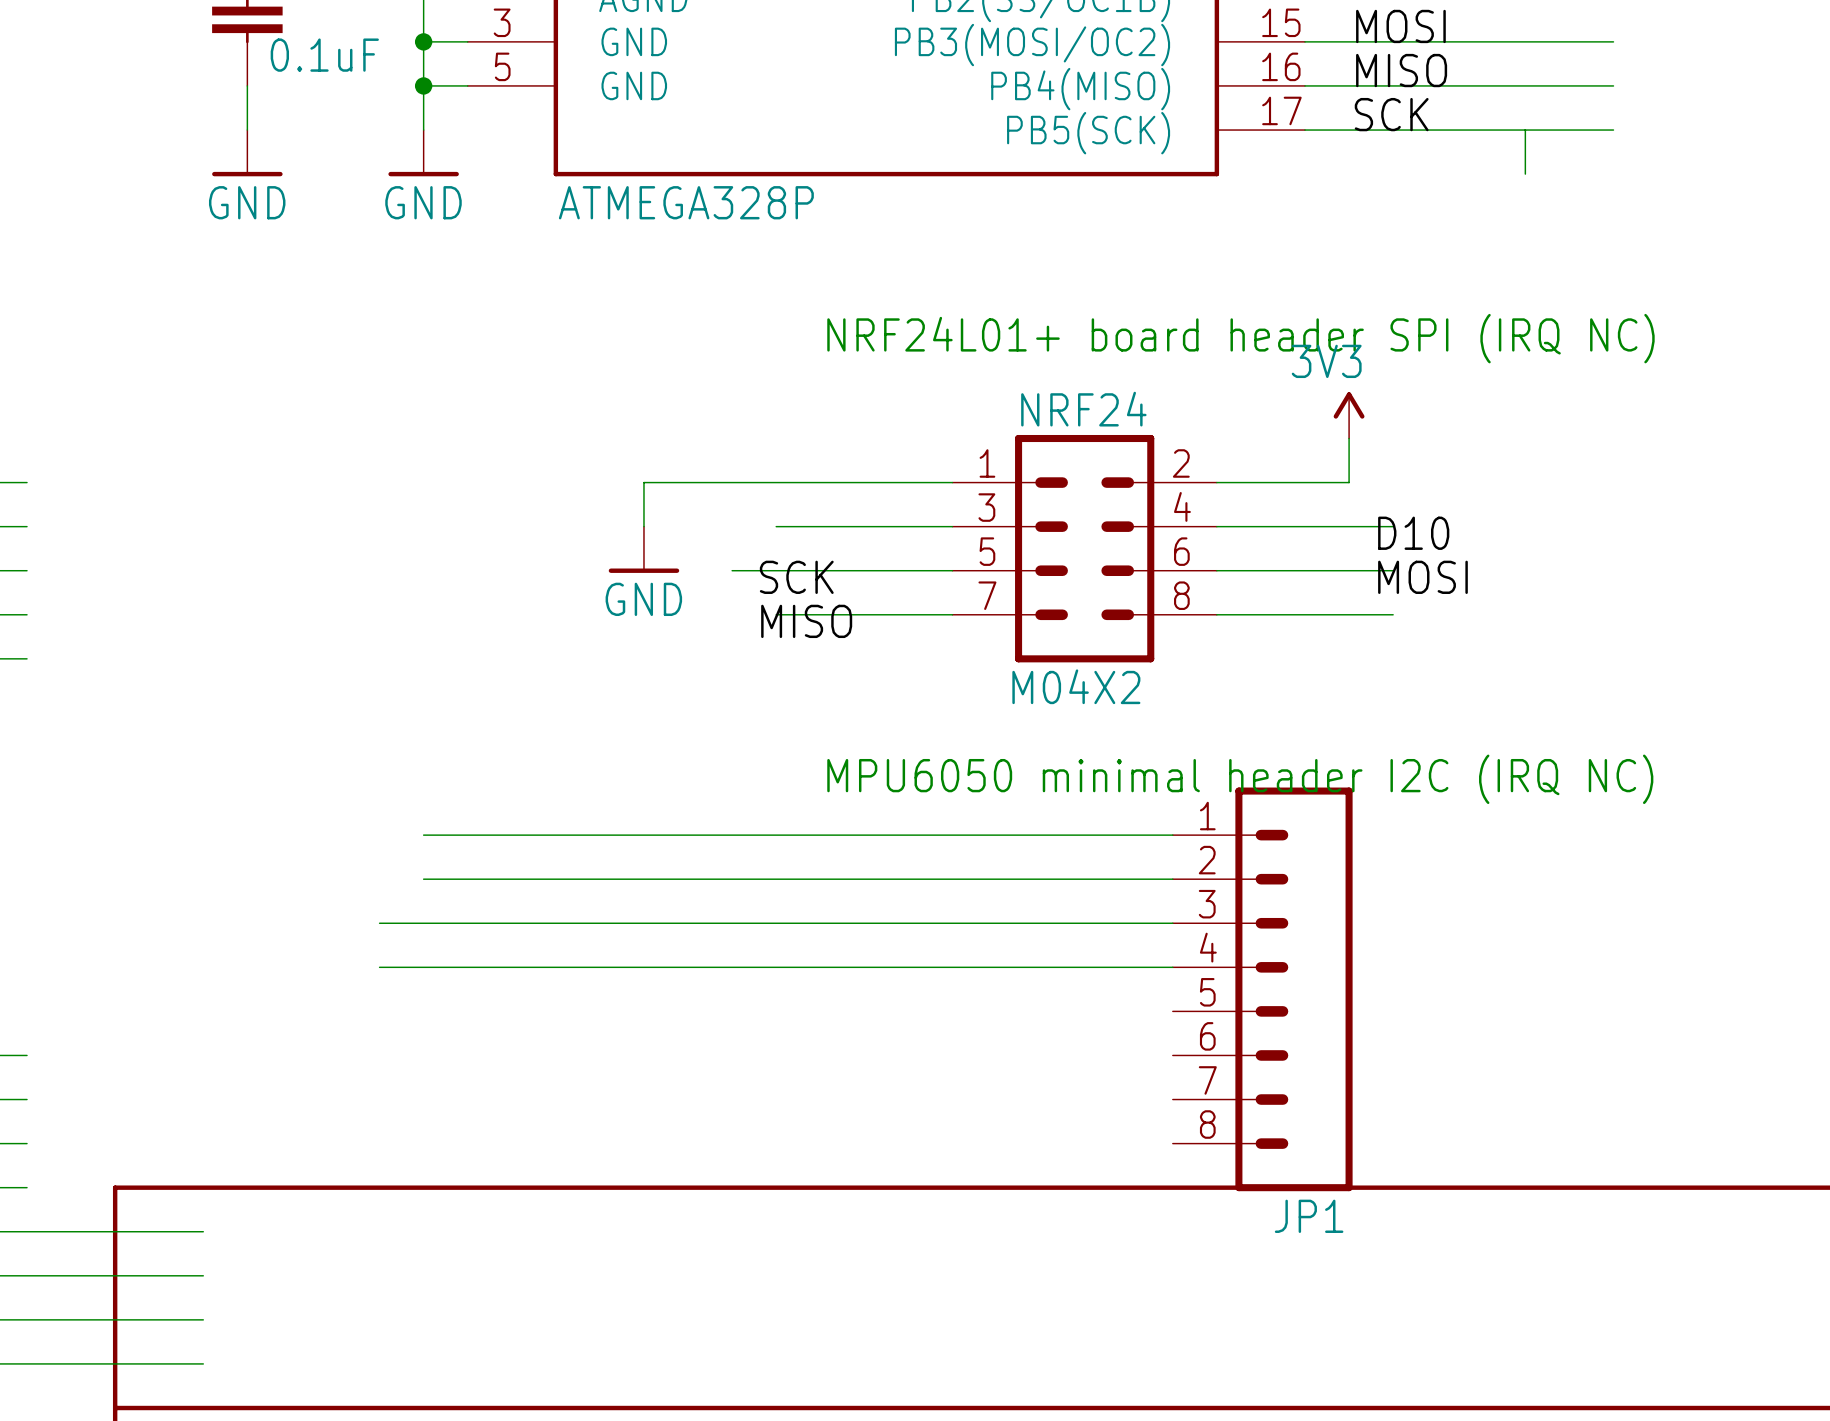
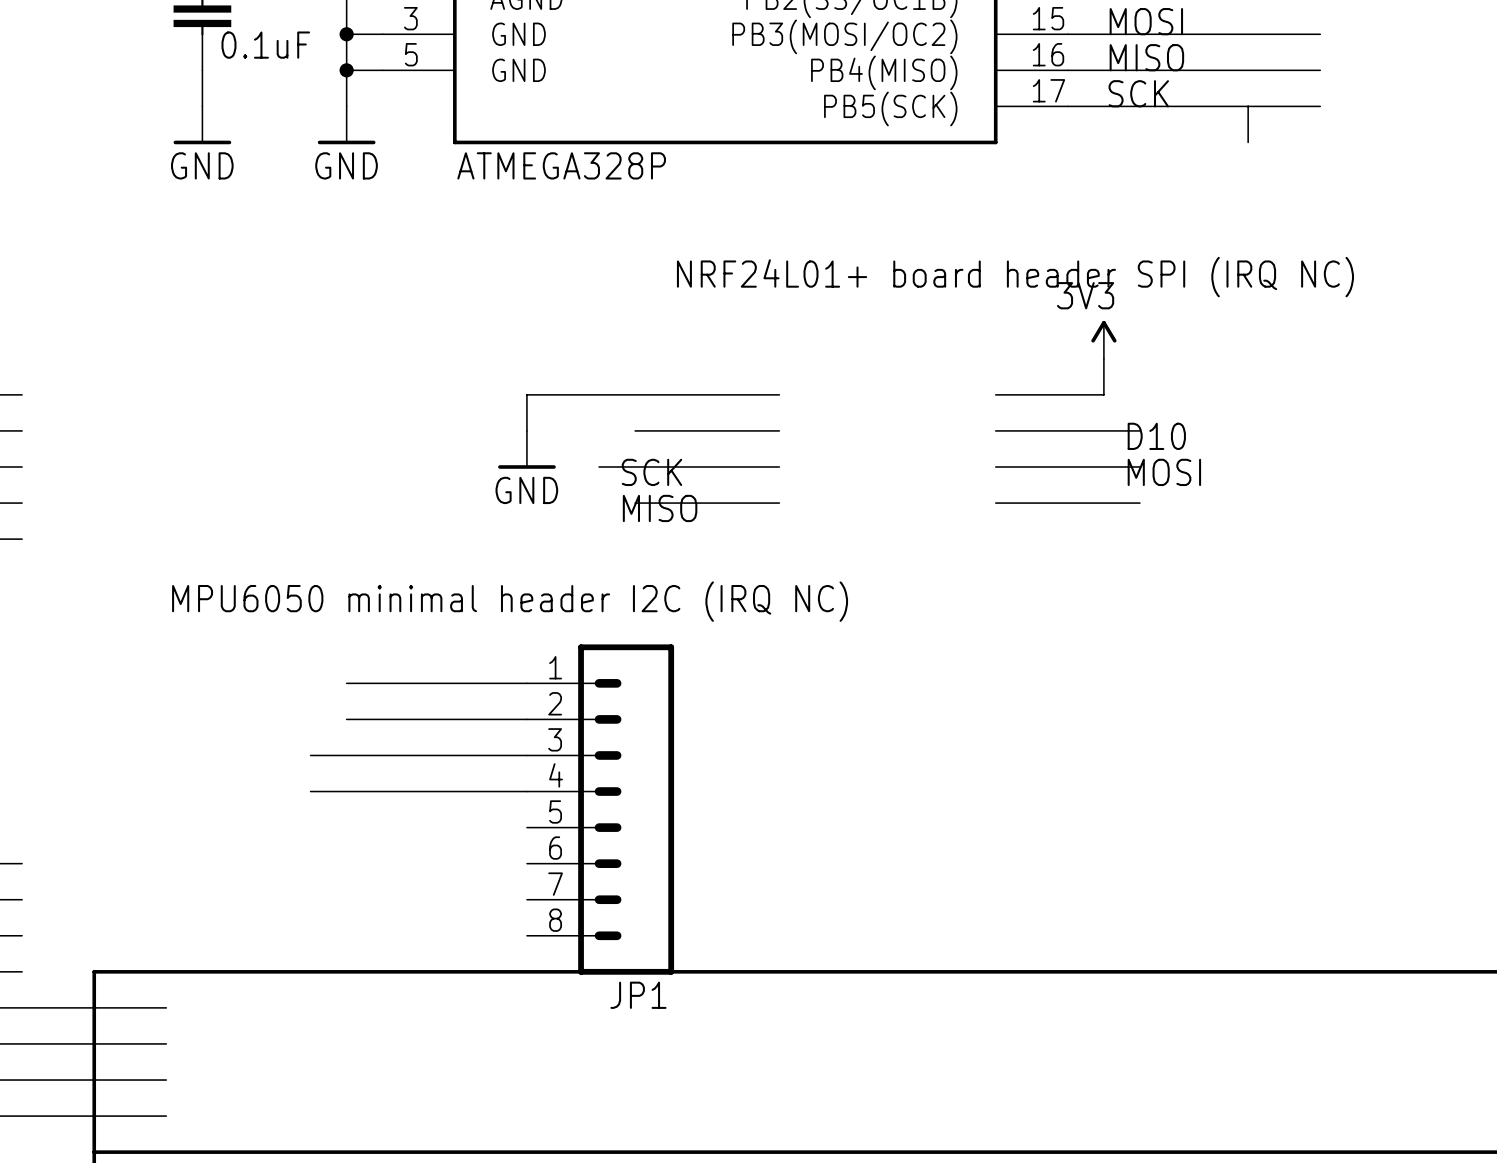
NRF24: M04X2 (1084, 548) -> none
text: none -> MPU6050 minimal header I2C (IRQ NC) (510, 601)
text: MPU6050 minimal header I2C (IRQ NC) (1240, 779) -> none
wire: (643, 835) (1172, 835) -> none
wire: (643, 879) (1172, 879) -> none
wire: (643, 923) (1172, 923) -> none
wire: (643, 967) (1172, 967) -> none
JP1 position: (1262, 989) -> (600, 809)

